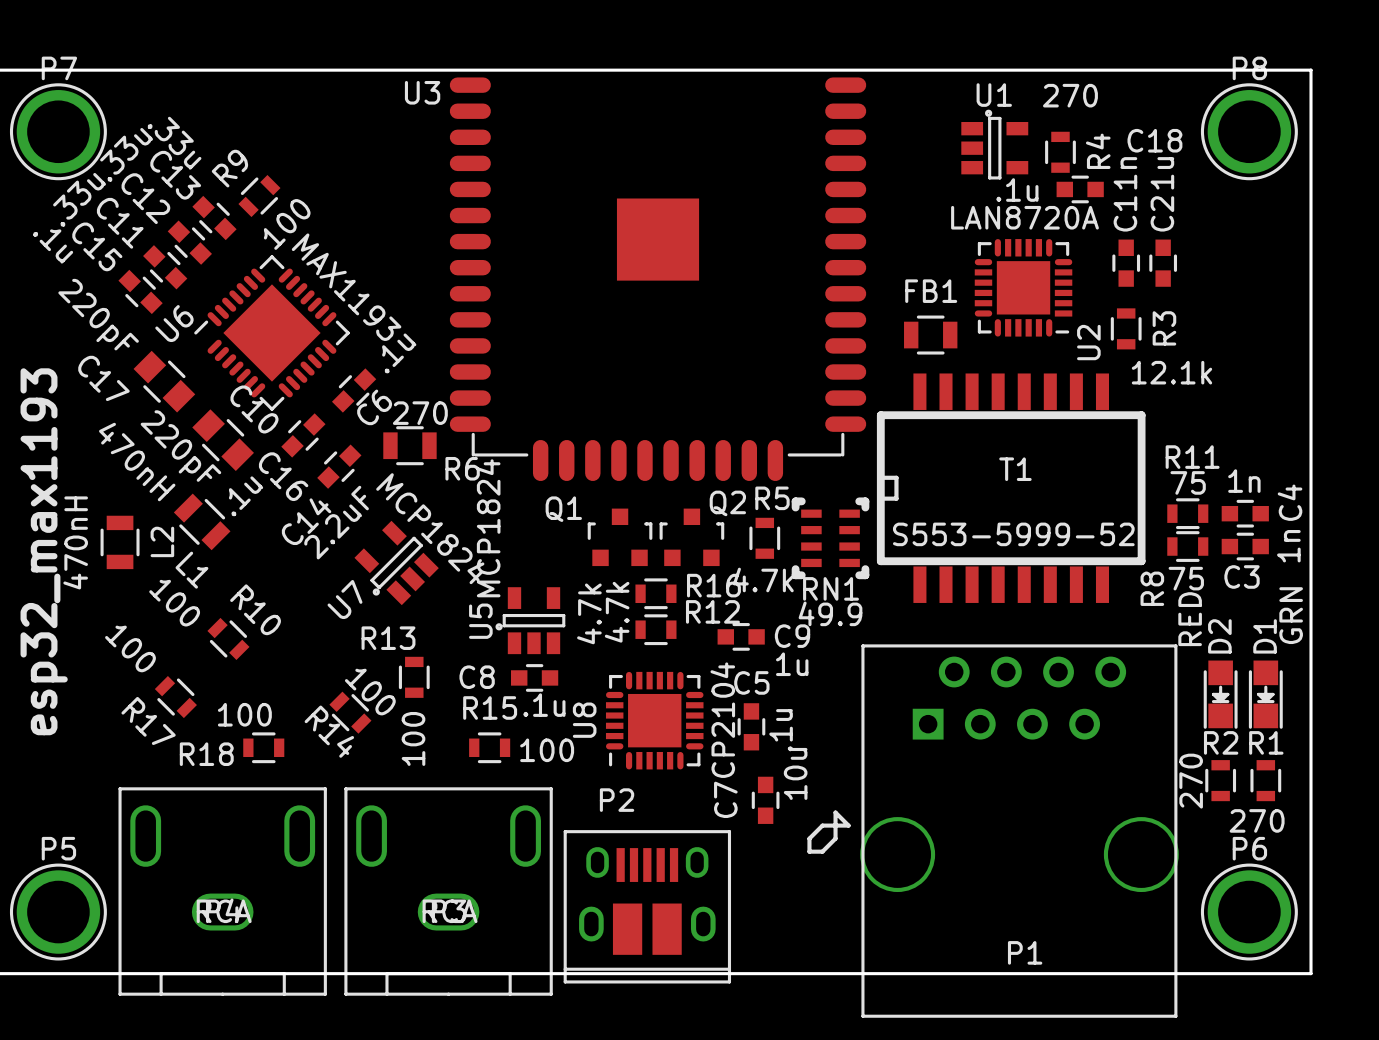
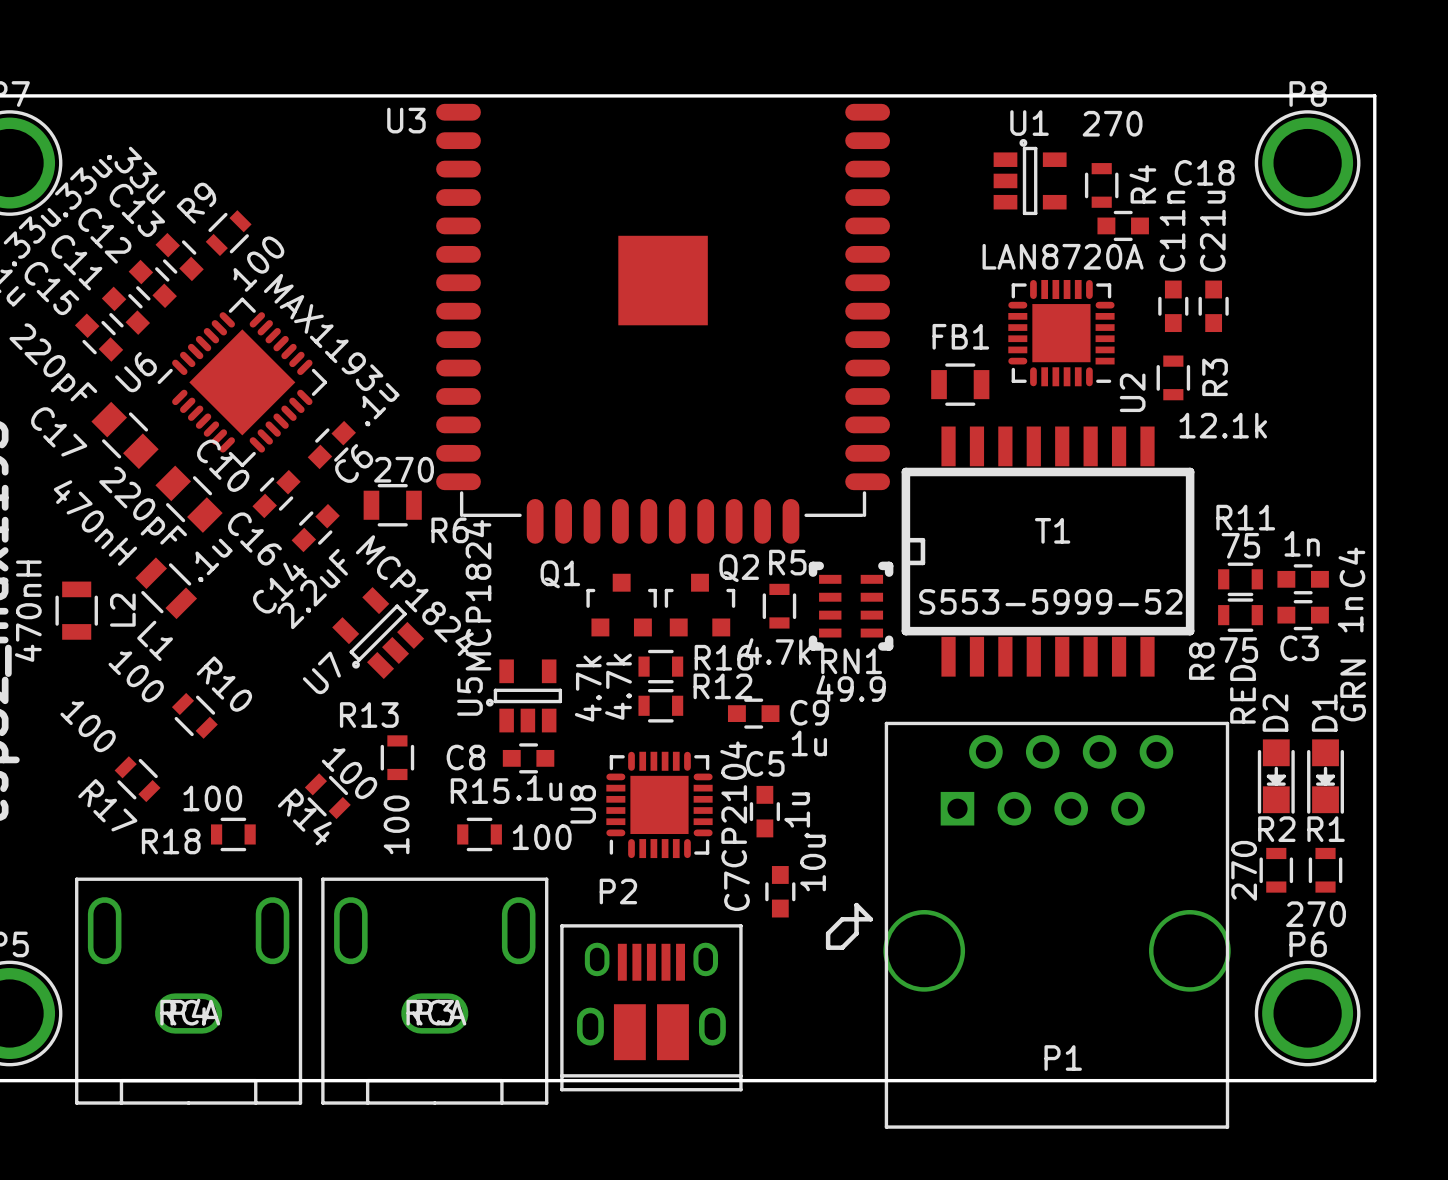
C18 value: .1u (1017, 190) -> none

